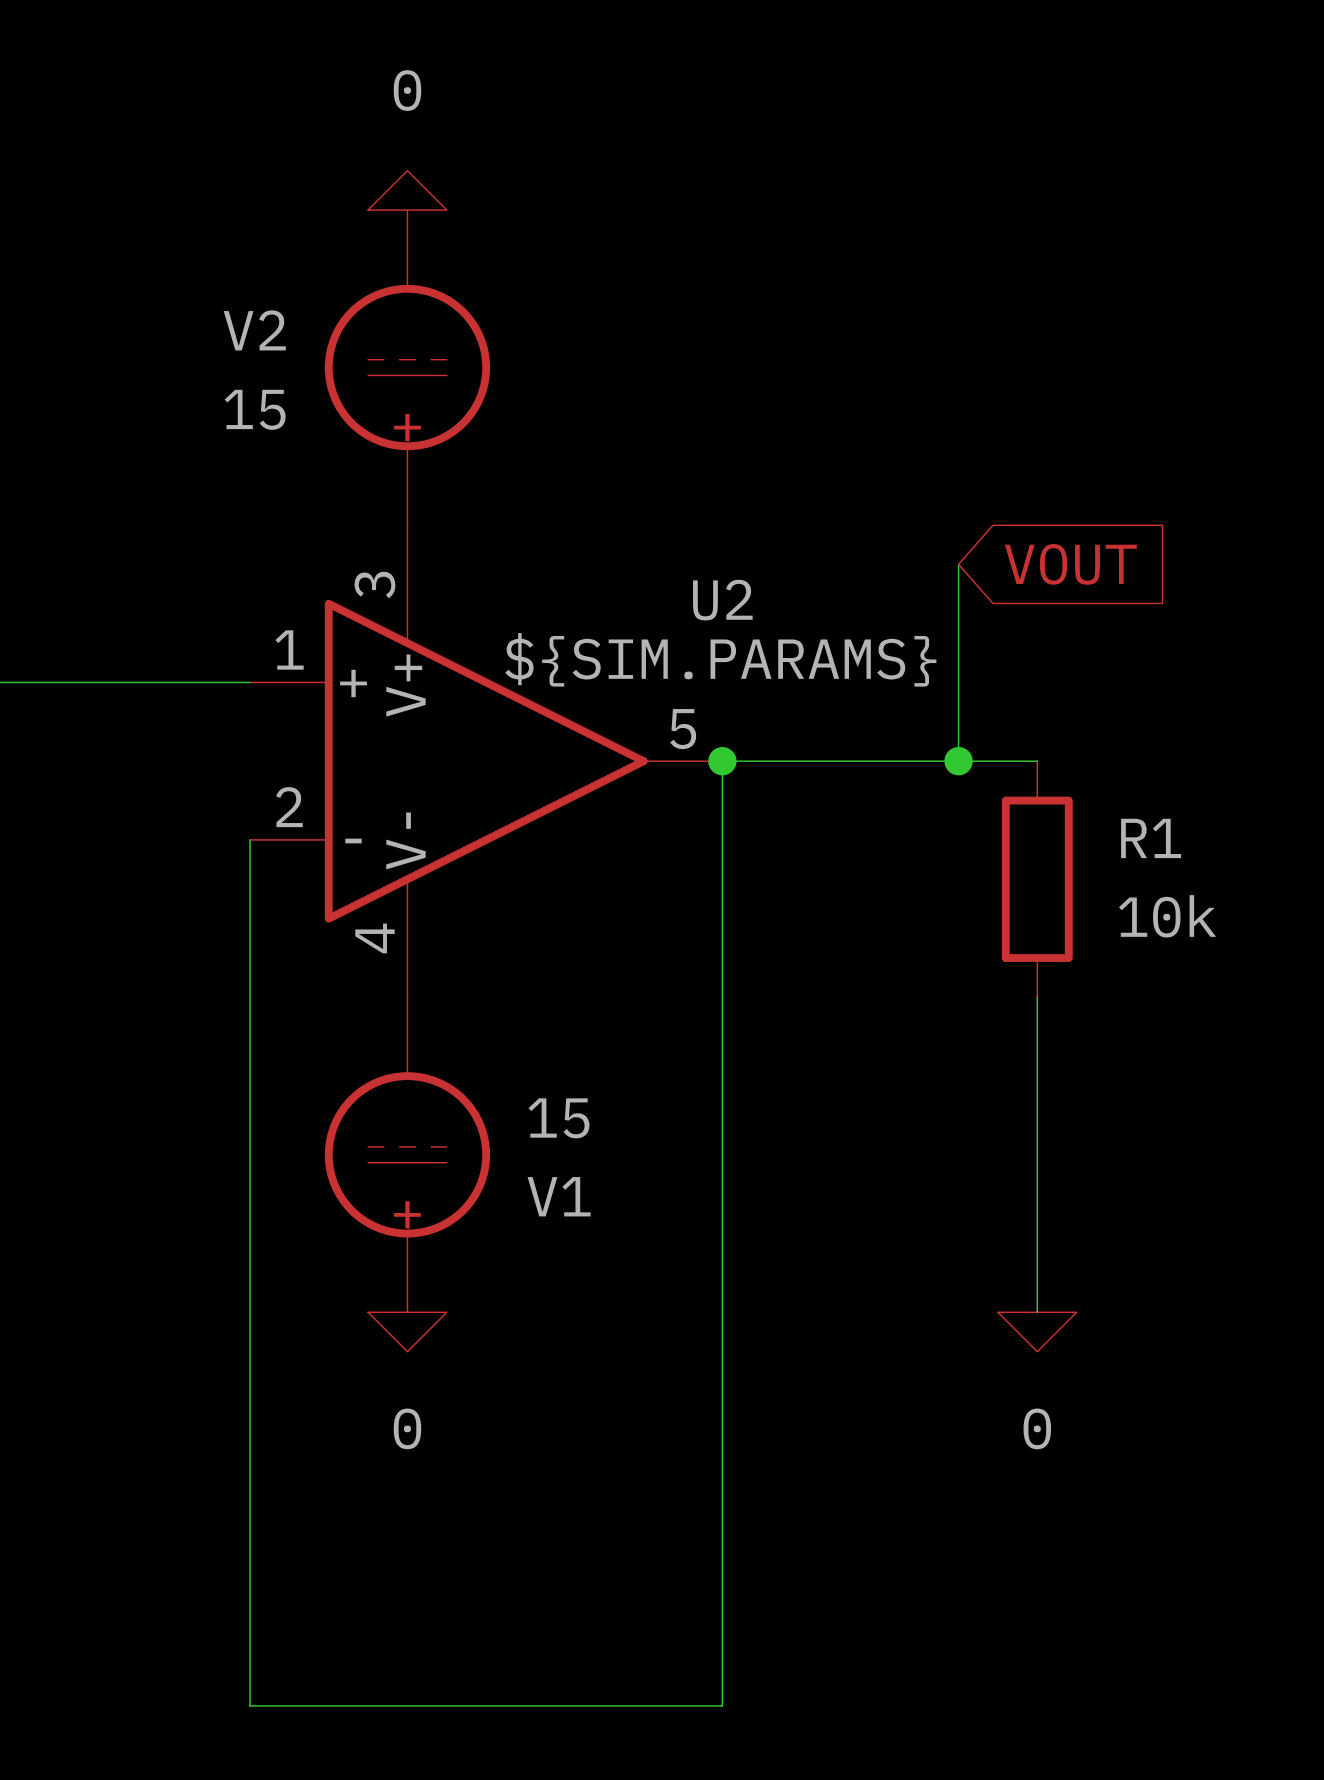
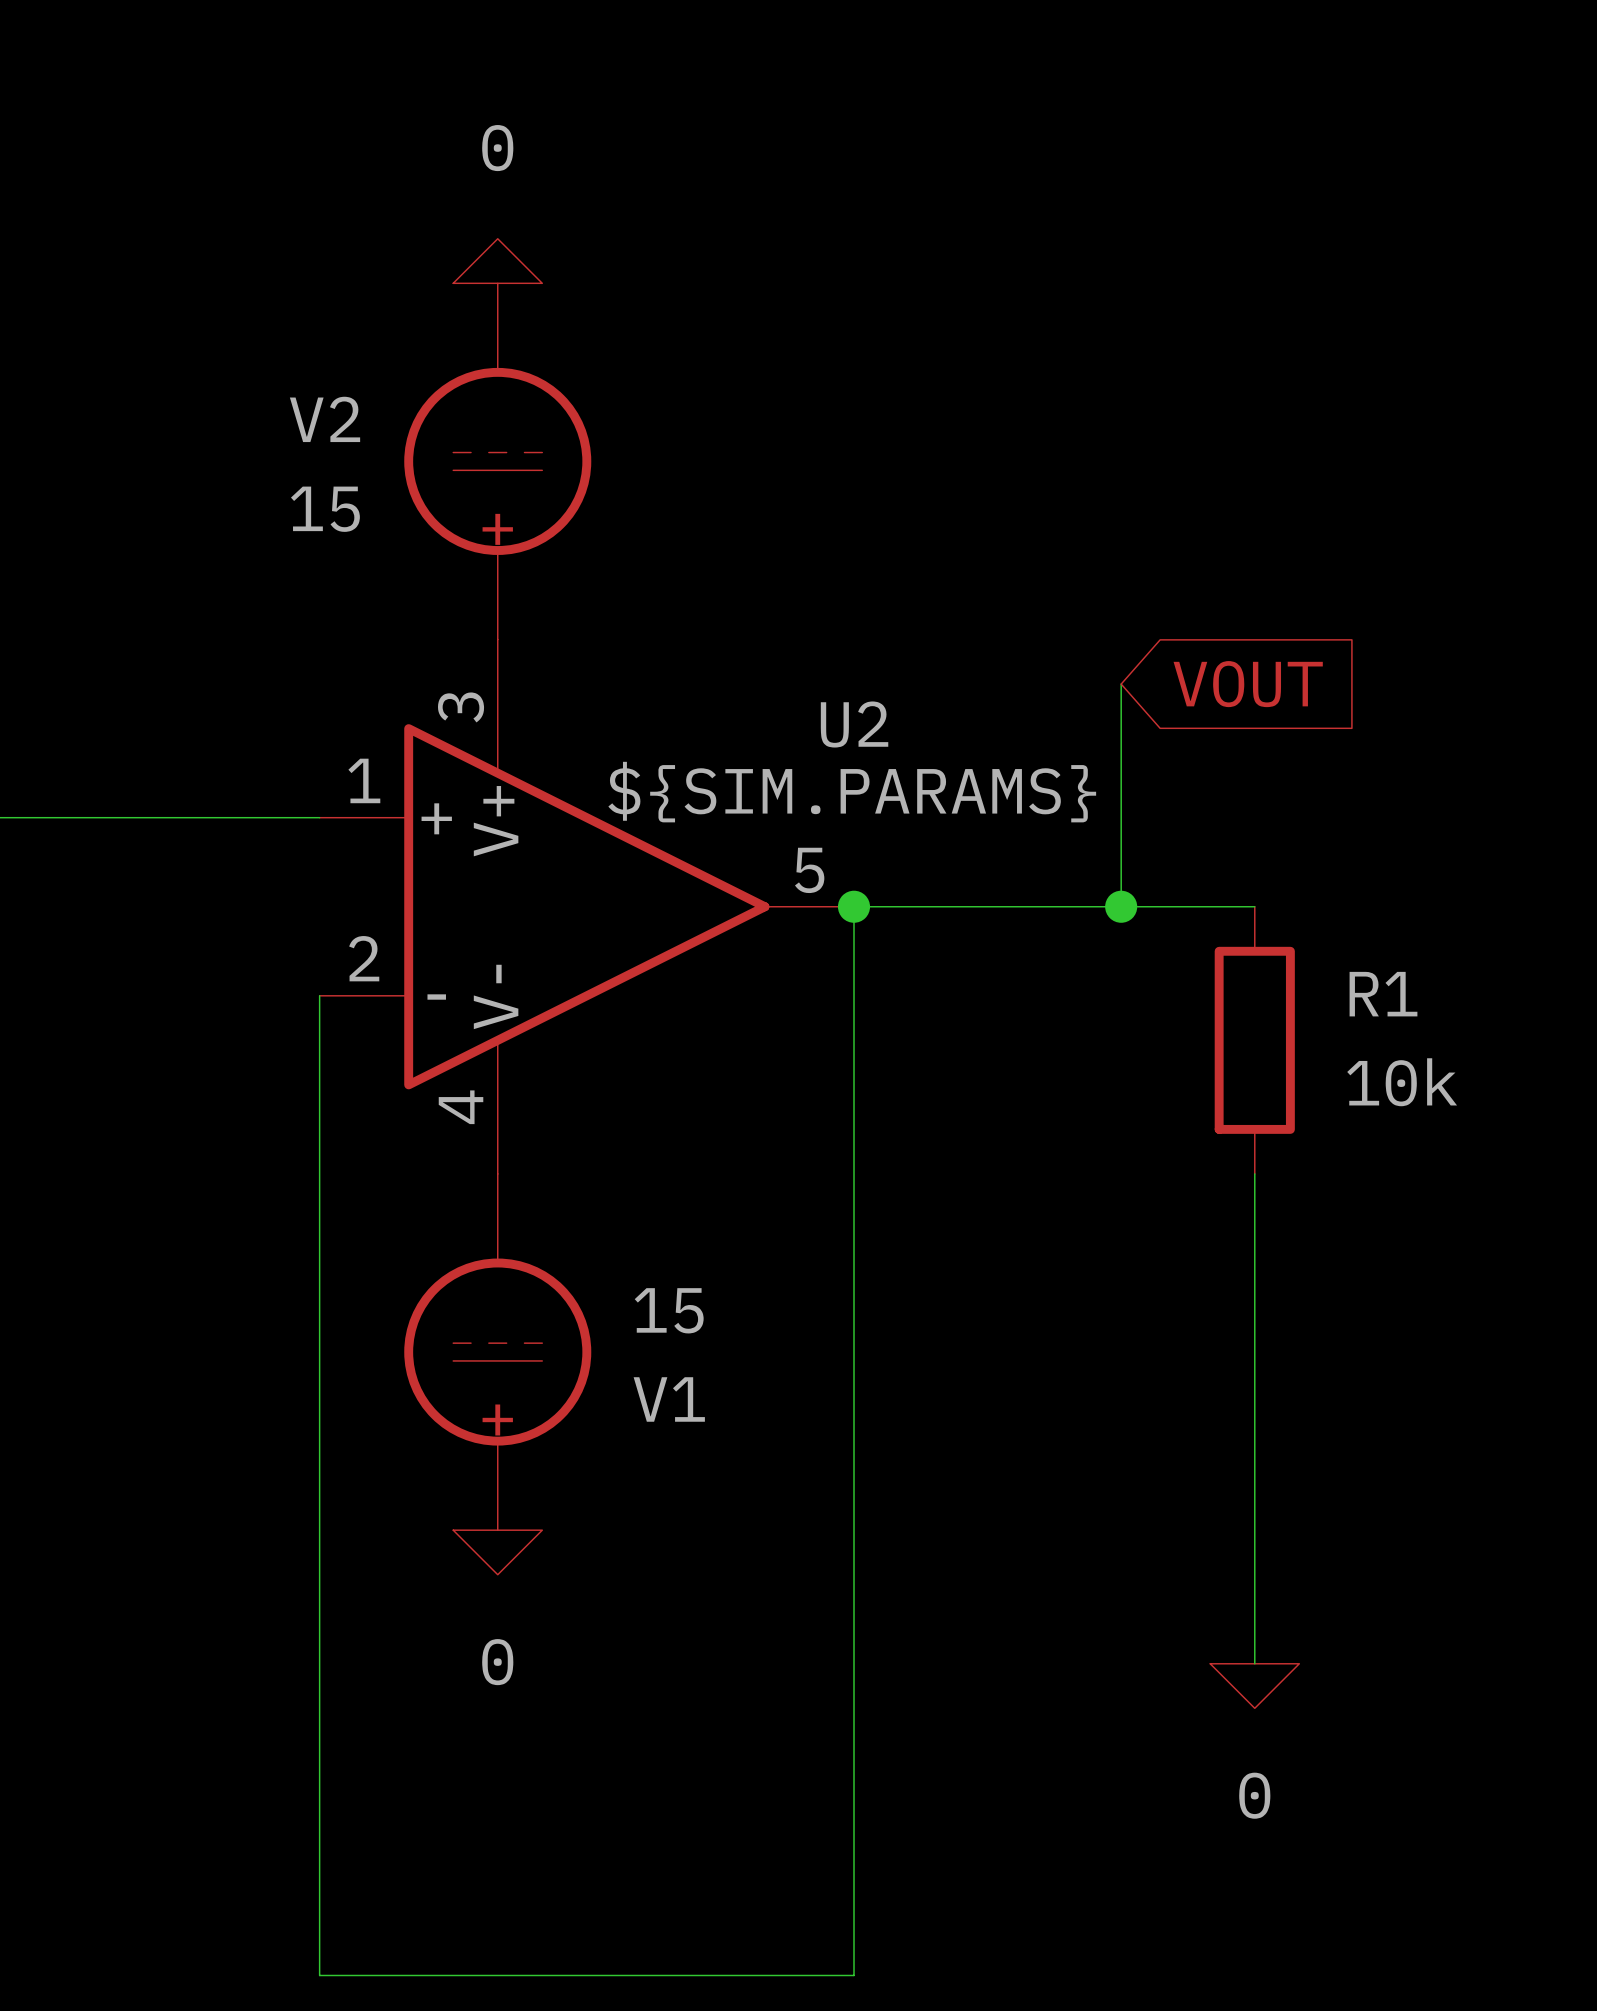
wire: none -> (1210, 906) (1254, 906)
R1 position: (1037, 879) -> (1254, 1040)
wire: (1037, 997) (1037, 1312) -> none
wire: none -> (1254, 1173) (1254, 1663)
power symbol position: 0 (1037, 1331) -> 0 (1254, 1686)

